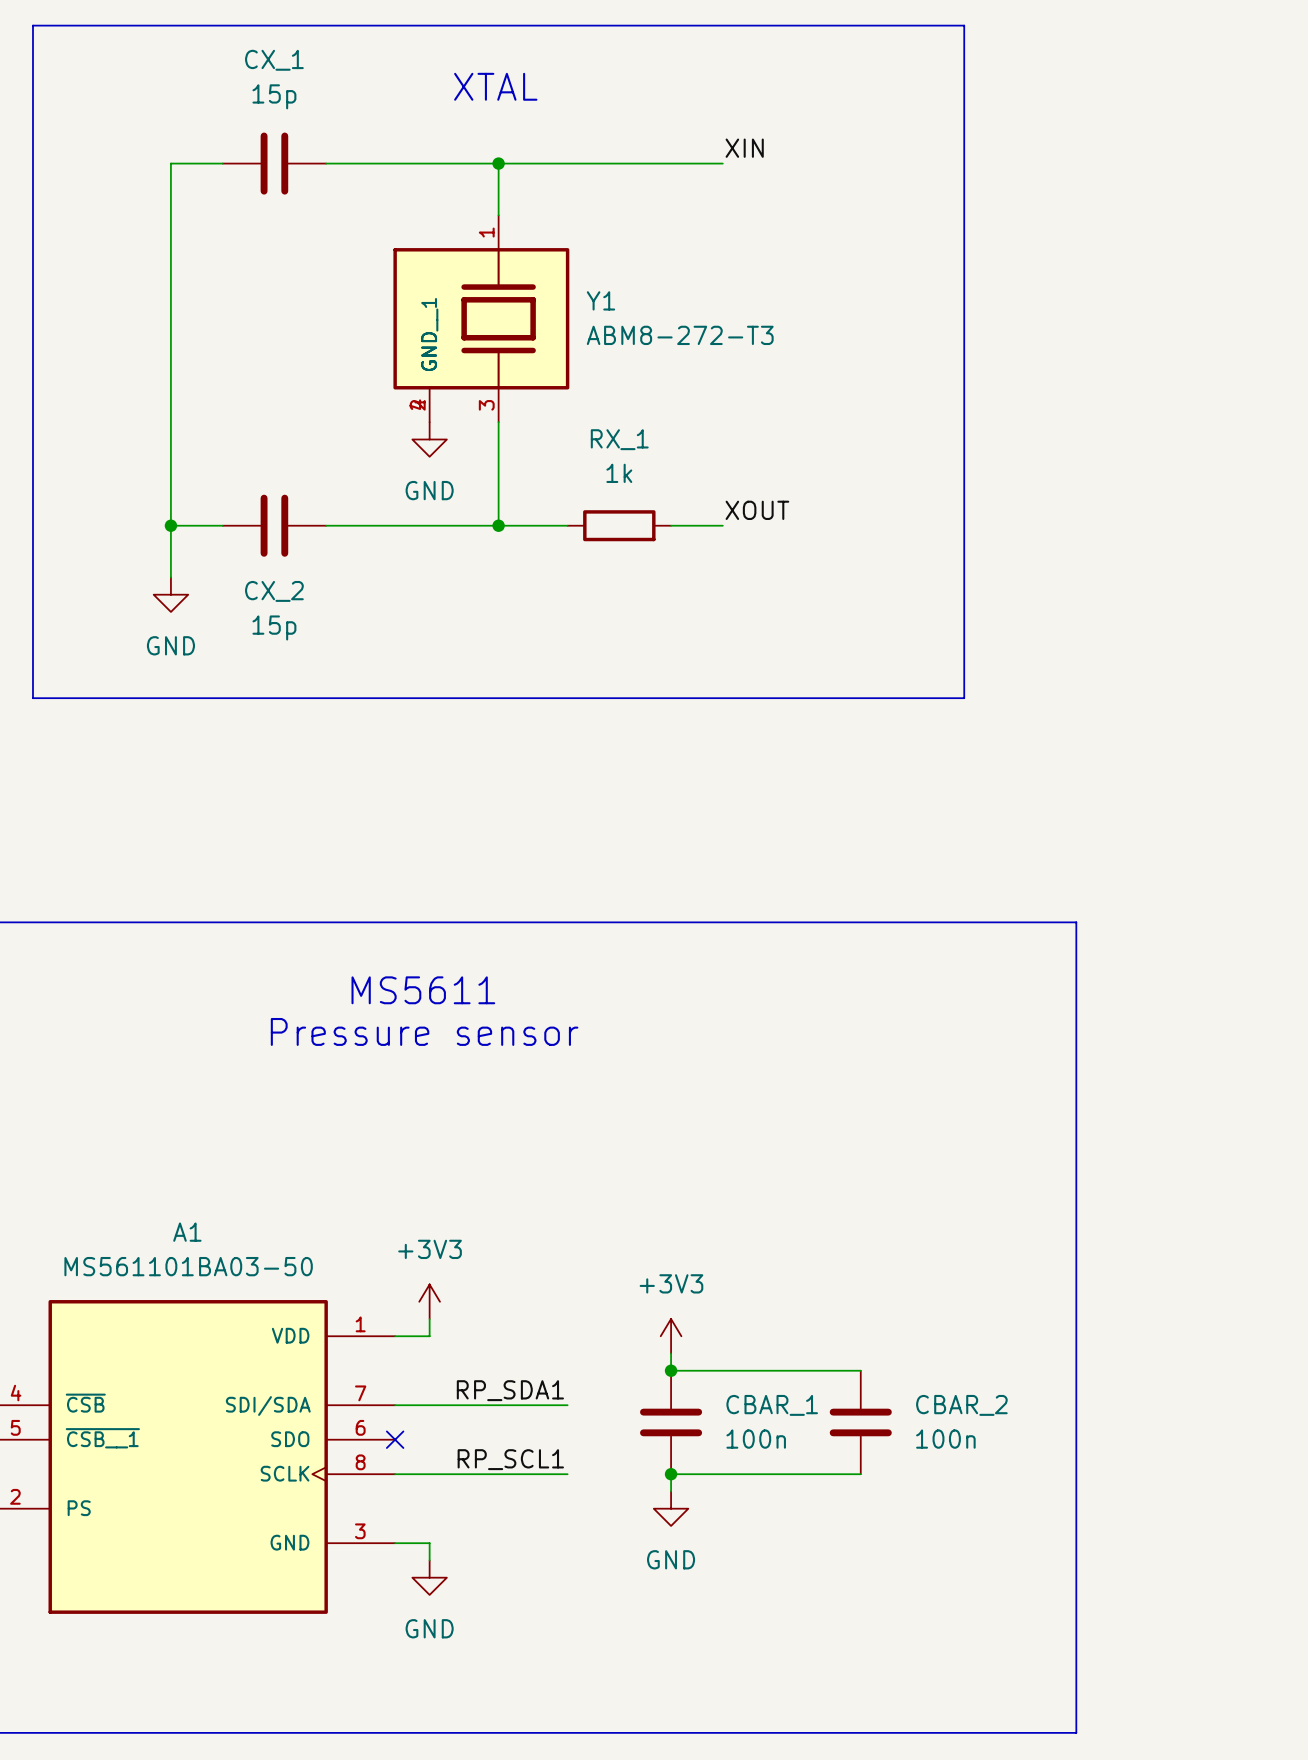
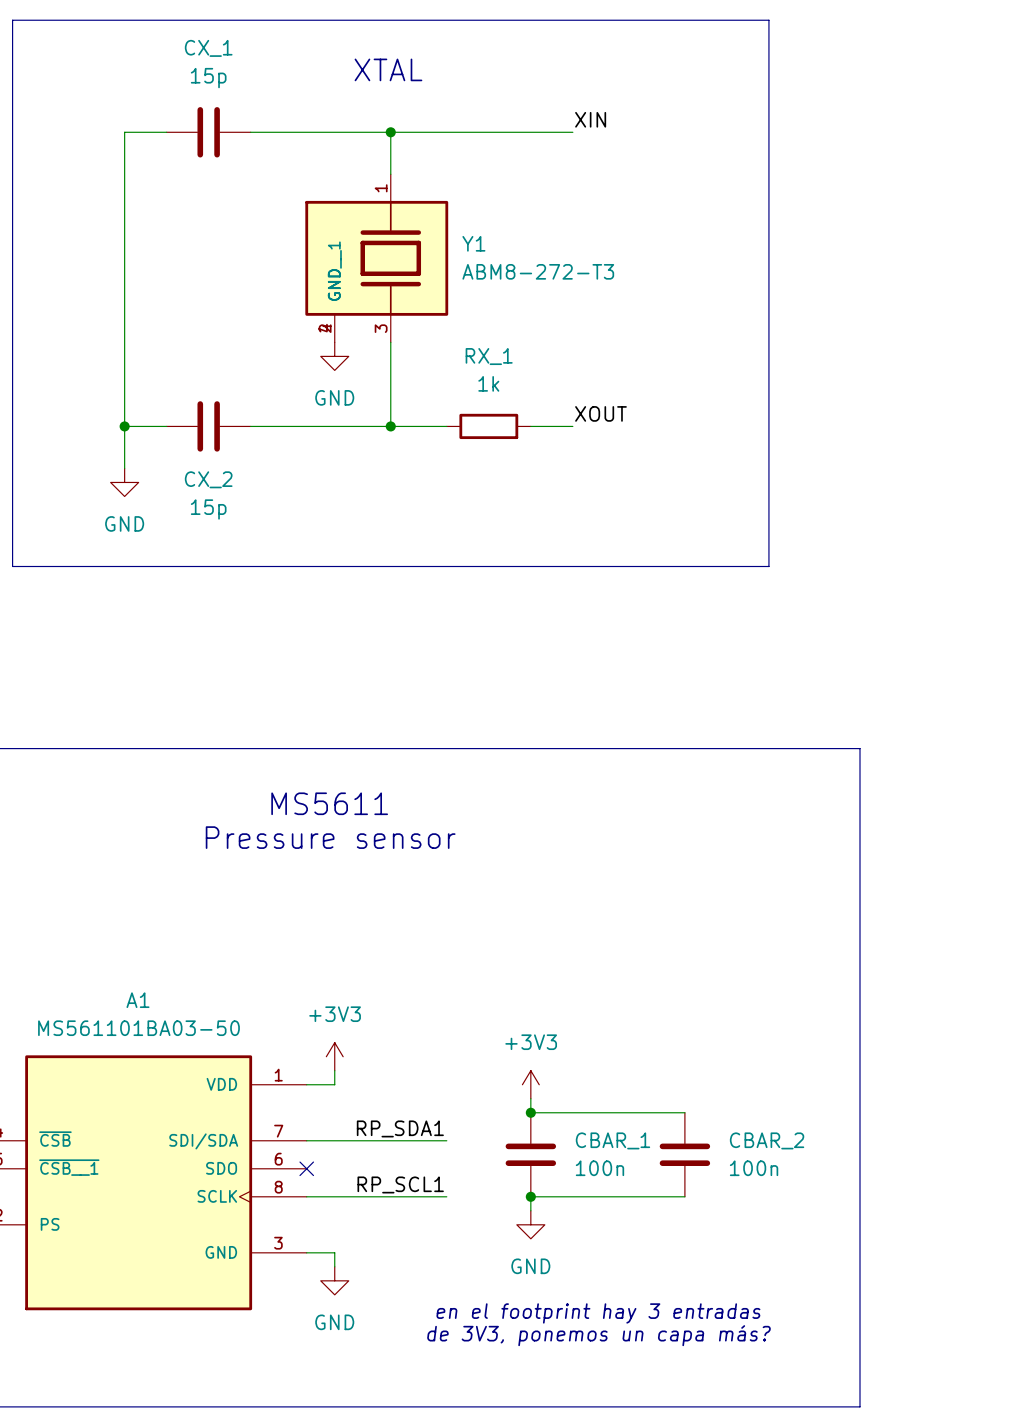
text: none -> en el footprint hay 3 entradas (598, 1313)
text: none -> de 3V3, ponemos un capa más? (598, 1335)

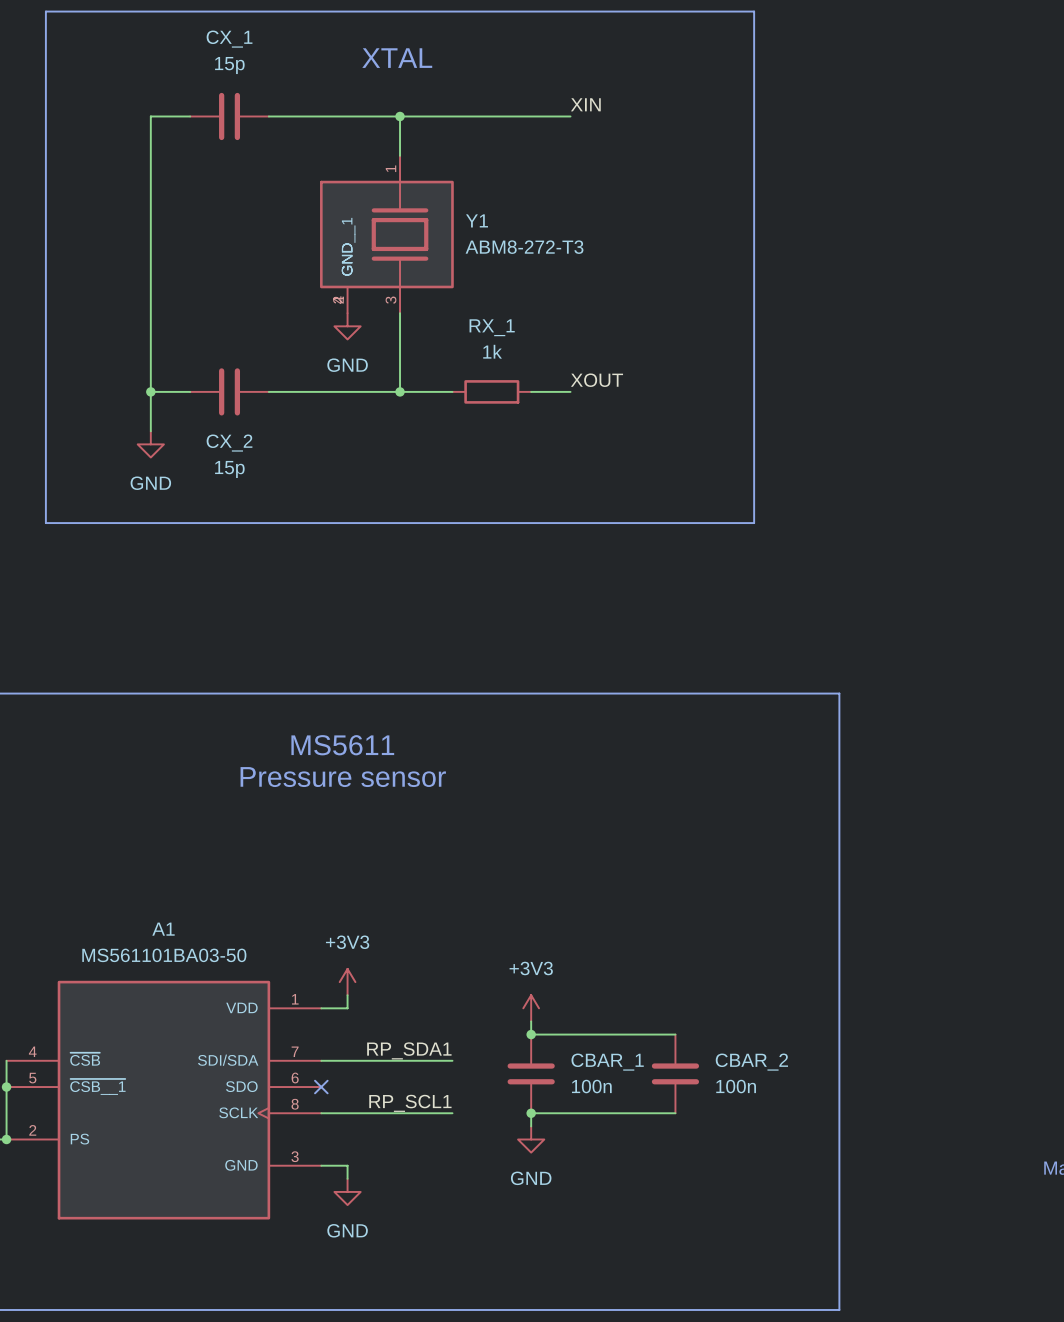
text: en el footprint hay 3 entradas (598, 1313) -> none
text: de 3V3, ponemos un capa más? (598, 1335) -> none

